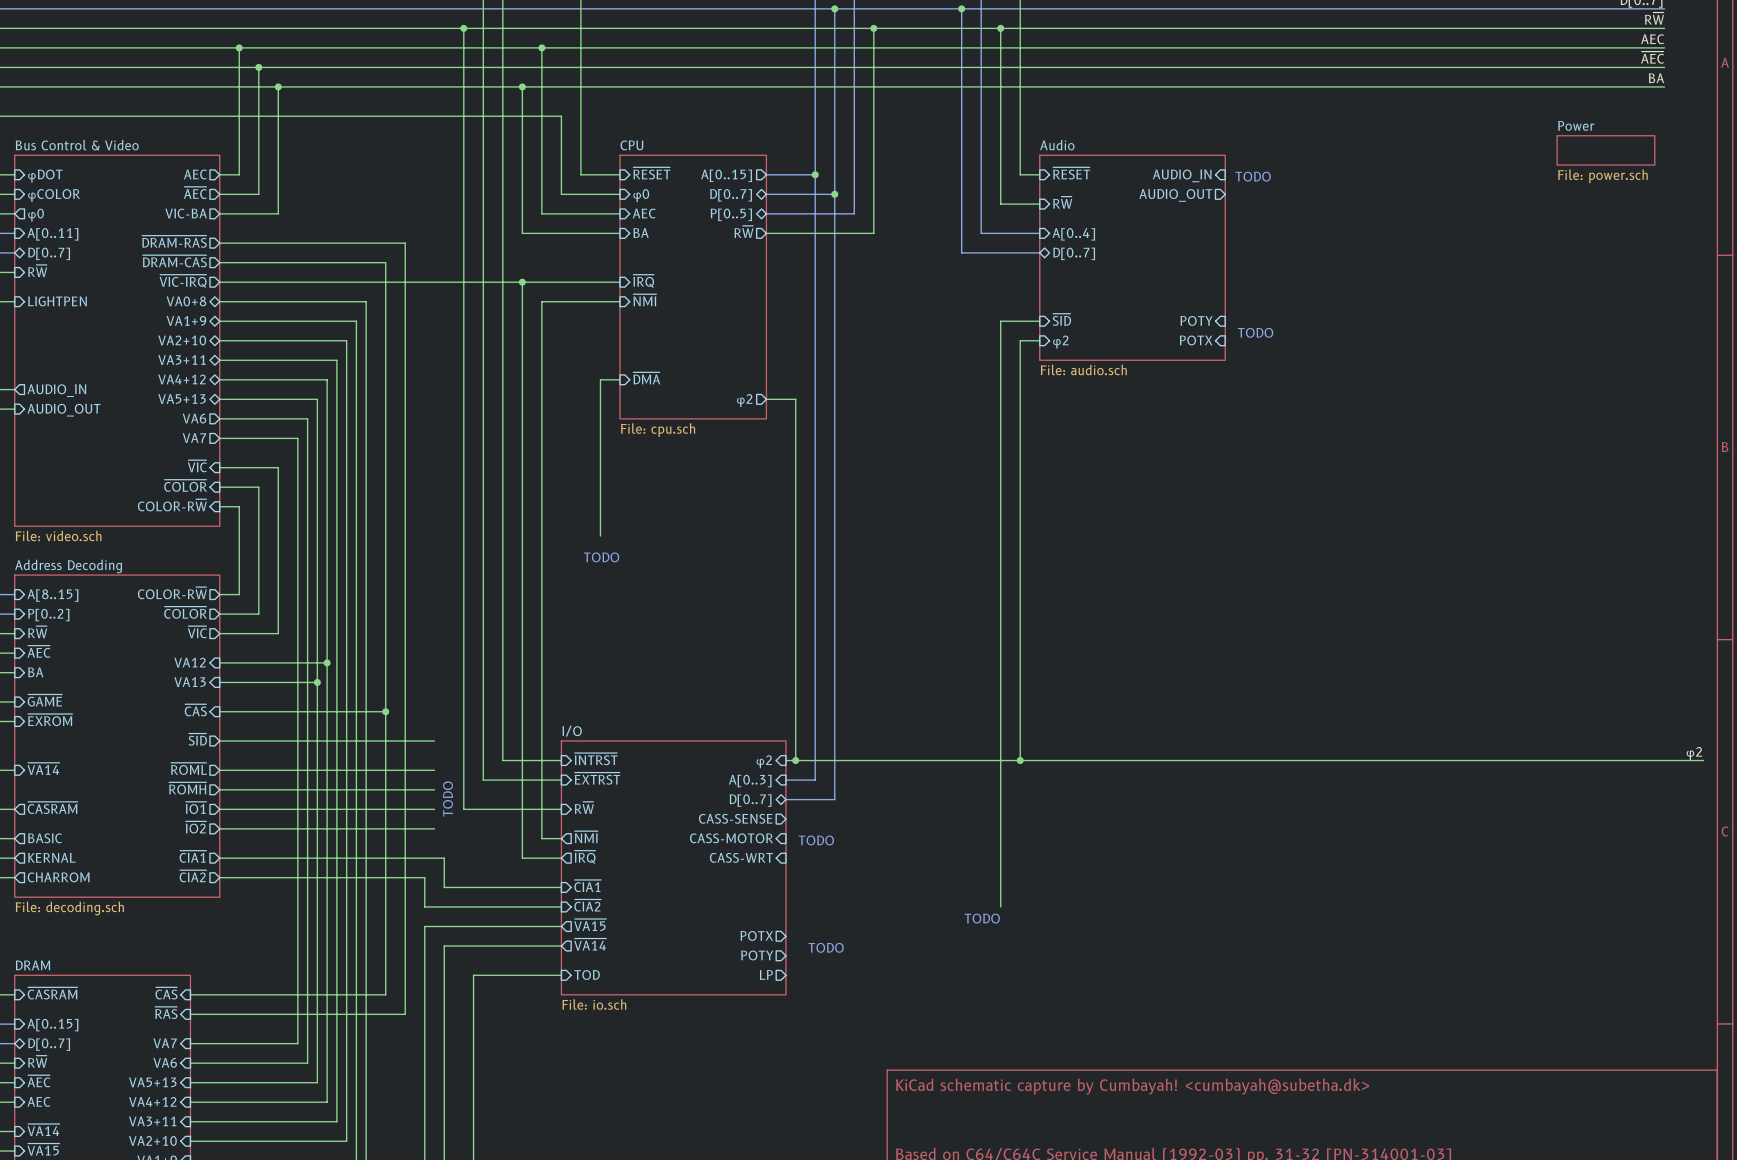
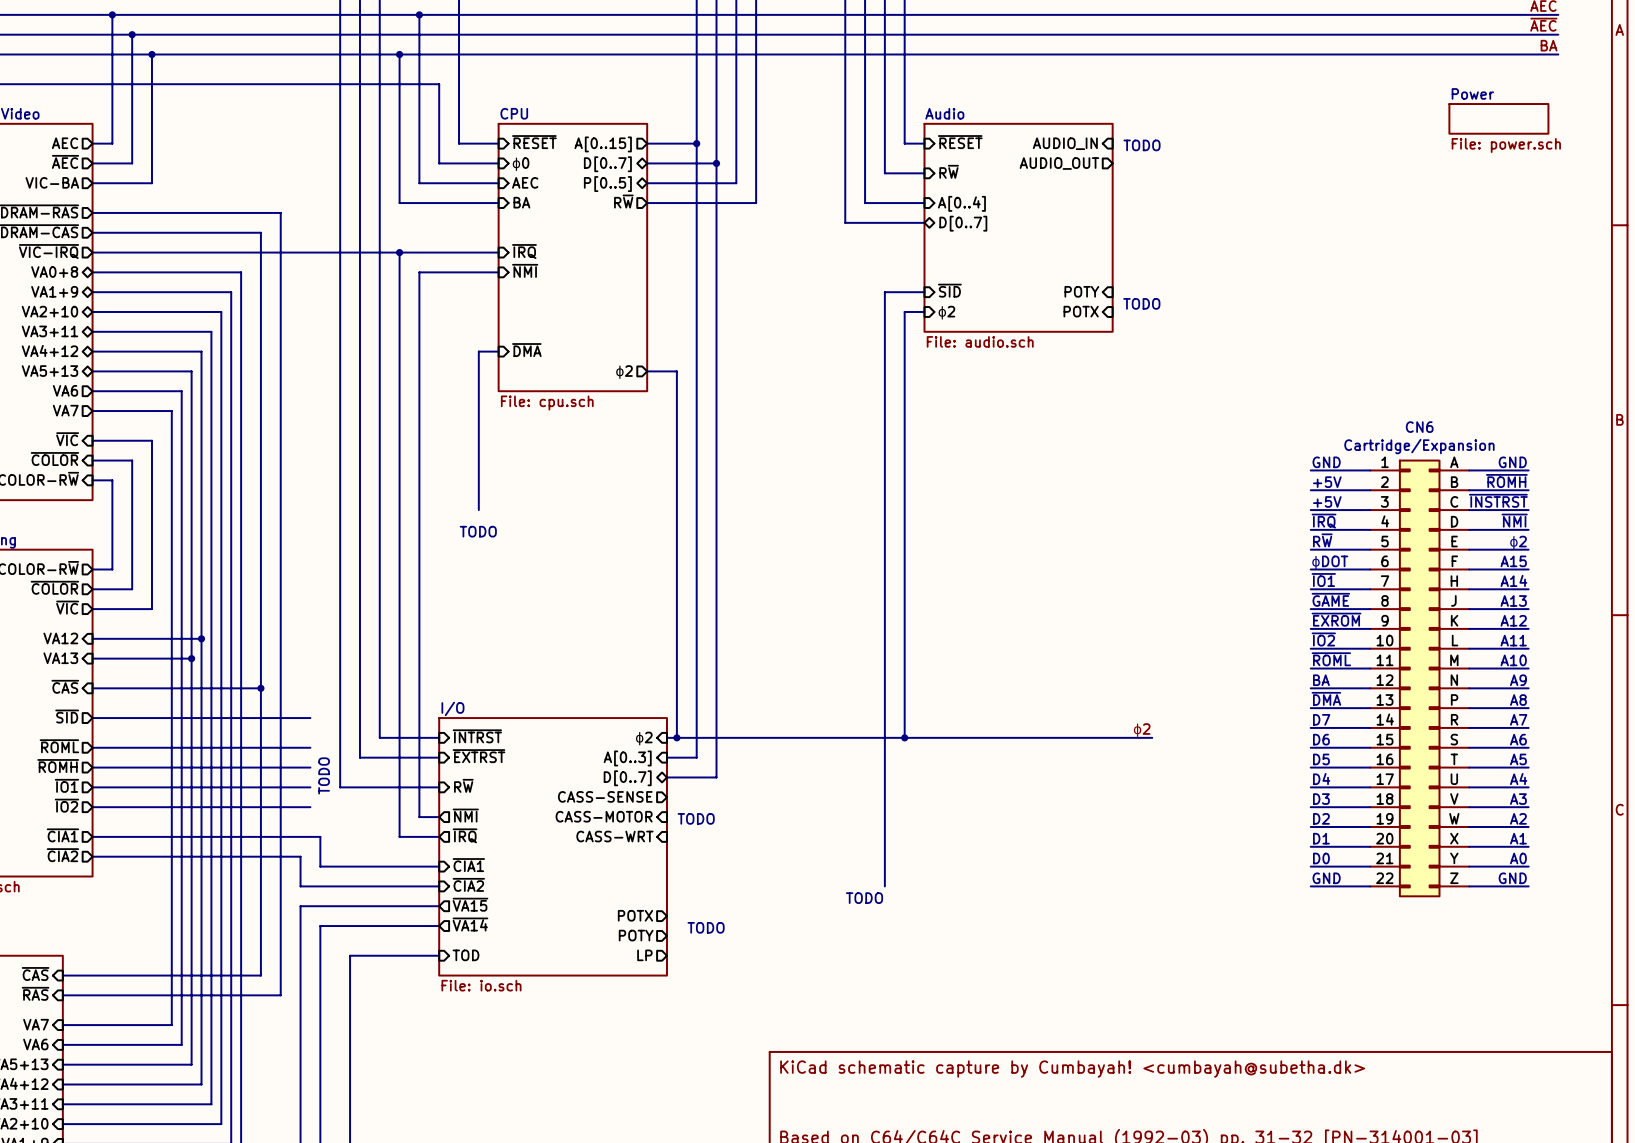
text: none -> GND (1326, 462)
text: none -> GND (1512, 462)
wire: none -> (1310, 470) (1370, 470)
wire: none -> (1469, 470) (1528, 470)
text: none -> ~{ROMH} (1506, 481)
text: none -> +5V (1327, 482)
wire: none -> (1310, 490) (1370, 490)
wire: none -> (1469, 490) (1528, 490)
text: none -> ~{INSTRST} (1498, 500)
text: none -> +5V (1327, 501)
wire: none -> (1310, 510) (1370, 510)
wire: none -> (1469, 510) (1528, 510)
text: none -> ~{IRQ} (1324, 521)
text: none -> ~{NMI} (1514, 520)
wire: none -> (1310, 529) (1370, 529)
wire: none -> (1469, 529) (1528, 529)
text: none -> R~{W} (1322, 540)
text: none -> ϕ2 (1518, 542)
wire: none -> (1310, 549) (1370, 549)
wire: none -> (1469, 549) (1528, 549)
text: none -> A15 (1513, 561)
text: none -> ϕDOT (1329, 562)
wire: none -> (1310, 569) (1370, 569)
wire: none -> (1469, 569) (1528, 569)
text: none -> ~{IO1} (1323, 580)
text: none -> A14 (1513, 580)
wire: none -> (1310, 589) (1370, 589)
wire: none -> (1469, 589) (1528, 589)
text: none -> ~{GAME} (1330, 599)
text: none -> A13 (1513, 600)
wire: none -> (1310, 609) (1370, 609)
wire: none -> (1469, 609) (1528, 609)
text: none -> ~{EXROM} (1336, 619)
text: none -> A12 (1513, 620)
wire: none -> (1310, 628) (1370, 628)
wire: none -> (1469, 628) (1528, 628)
text: none -> ~{IO2} (1323, 639)
text: none -> A11 (1513, 640)
wire: none -> (1310, 648) (1370, 648)
wire: none -> (1469, 648) (1528, 648)
text: none -> ~{ROML} (1331, 659)
text: none -> A10 (1513, 660)
wire: none -> (1310, 668) (1370, 668)
wire: none -> (1469, 668) (1528, 668)
CN6: none -> Cartridge/Expansion (1419, 678)
text: none -> BA (1321, 680)
text: none -> A9 (1518, 680)
wire: none -> (1310, 688) (1370, 688)
wire: none -> (1469, 688) (1528, 688)
text: none -> ~{DMA} (1326, 698)
text: none -> A8 (1518, 700)
wire: none -> (1310, 708) (1370, 708)
wire: none -> (1469, 708) (1528, 708)
text: none -> D7 (1321, 719)
text: none -> A7 (1518, 719)
wire: none -> (1310, 727) (1370, 727)
wire: none -> (1469, 727) (1528, 727)
label: none -> ϕ2 (1141, 730)
label: ϕ2 (1694, 753) -> none
wire: (1264, 760) (1703, 760) -> none
text: none -> D6 (1321, 739)
text: none -> A6 (1518, 739)
wire: none -> (1310, 747) (1370, 747)
wire: none -> (1469, 747) (1528, 747)
text: none -> D5 (1321, 759)
text: none -> A5 (1518, 759)
wire: none -> (1310, 767) (1370, 767)
wire: none -> (1469, 767) (1528, 767)
text: none -> D4 (1321, 779)
text: none -> A4 (1518, 779)
wire: none -> (1310, 787) (1370, 787)
wire: none -> (1469, 787) (1528, 787)
text: none -> D3 (1321, 799)
text: none -> A3 (1518, 799)
wire: none -> (1310, 807) (1370, 807)
wire: none -> (1469, 807) (1528, 807)
text: none -> D2 (1321, 818)
text: none -> A2 (1518, 818)
wire: none -> (1310, 826) (1370, 826)
wire: none -> (1469, 826) (1528, 826)
text: none -> D1 (1321, 838)
text: none -> A1 (1518, 838)
wire: none -> (1310, 846) (1370, 846)
wire: none -> (1469, 846) (1528, 846)
text: none -> D0 (1321, 858)
text: none -> A0 (1518, 858)
wire: none -> (1310, 866) (1370, 866)
wire: none -> (1469, 866) (1528, 866)
text: none -> GND (1326, 878)
text: none -> GND (1512, 878)
wire: none -> (1310, 886) (1370, 886)
wire: none -> (1469, 886) (1528, 886)

